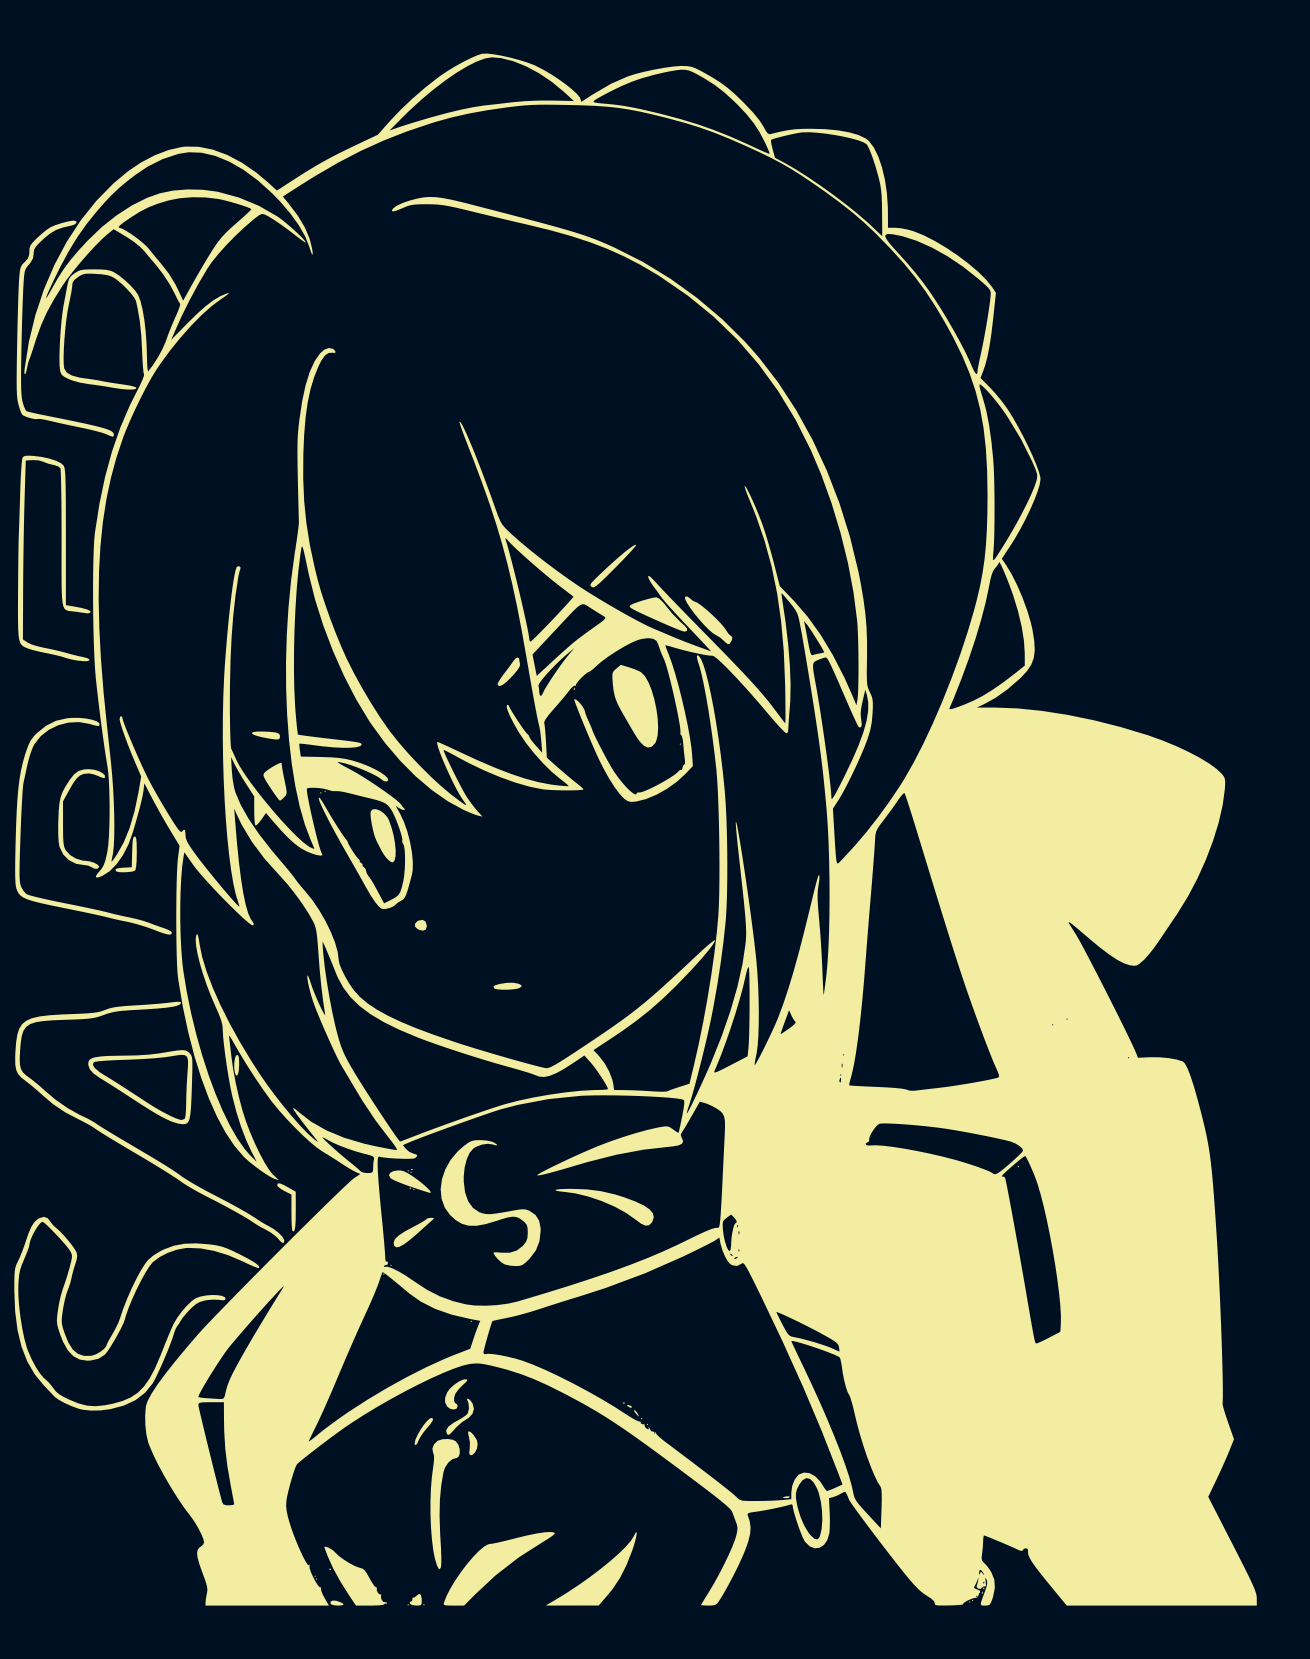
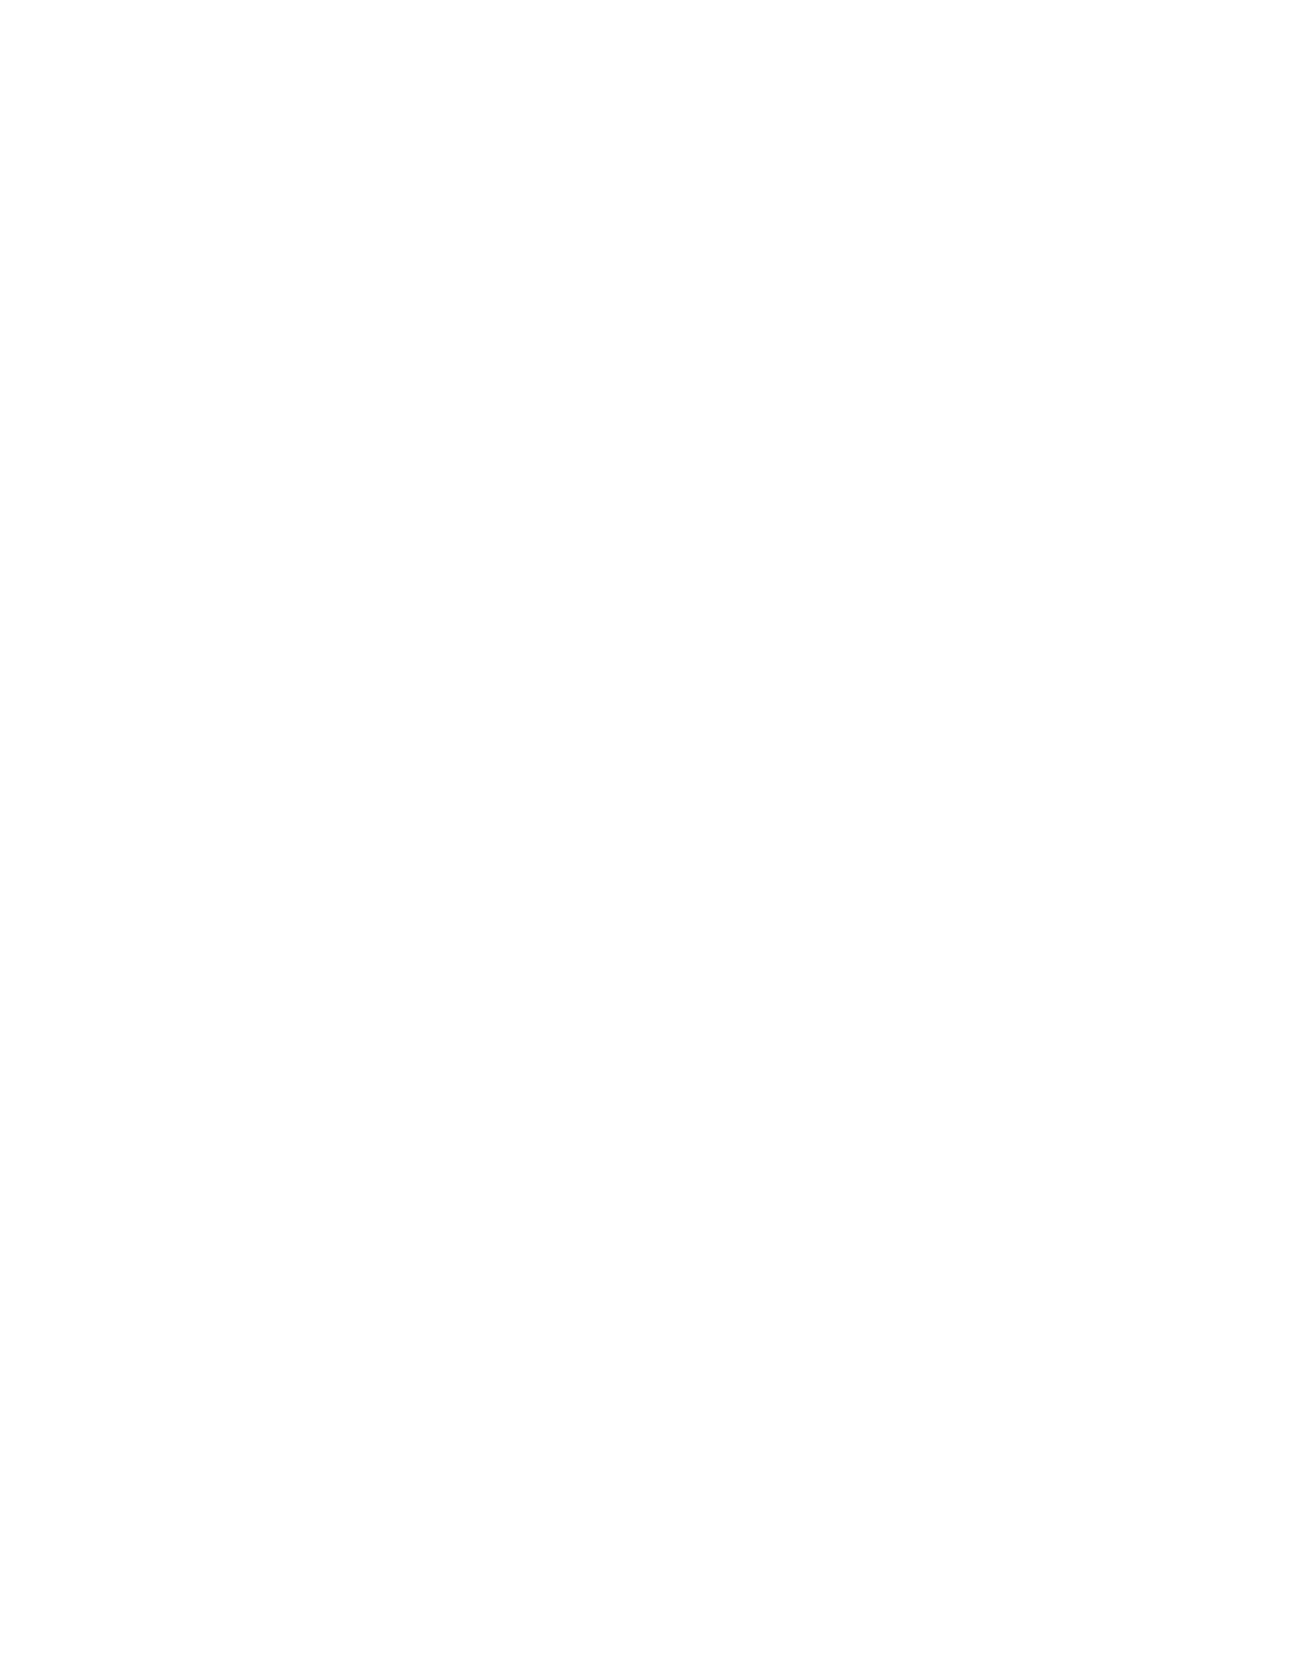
drawing: [14, 53, 1257, 1606] -> none

